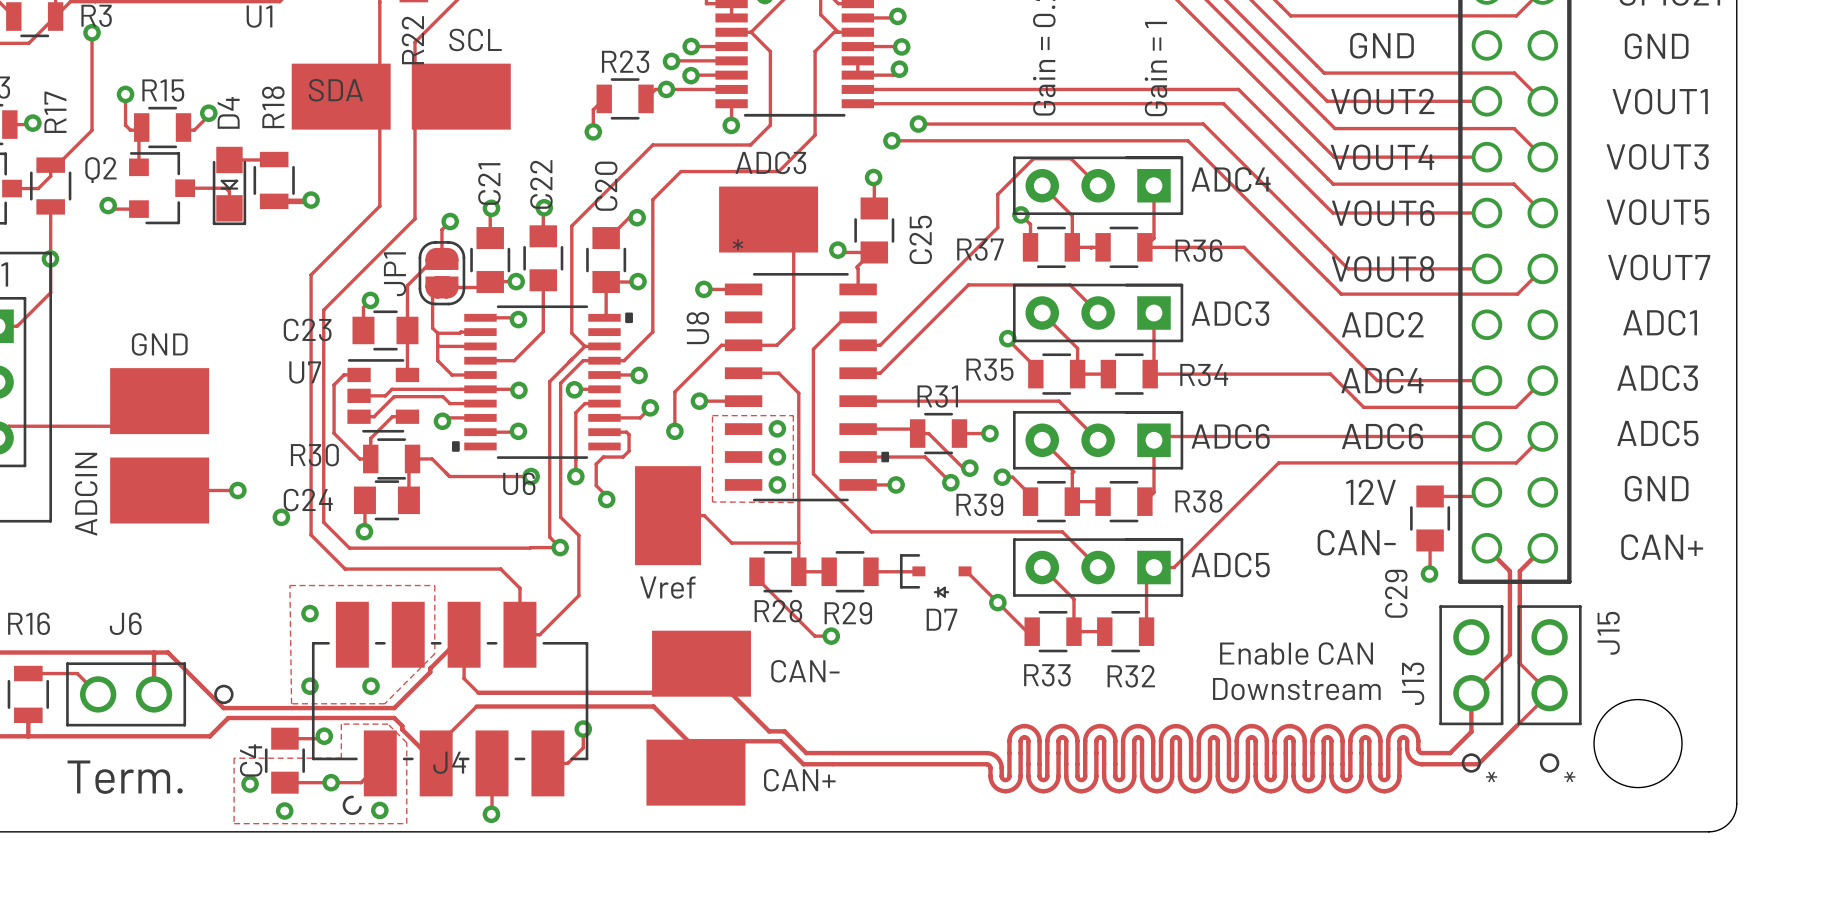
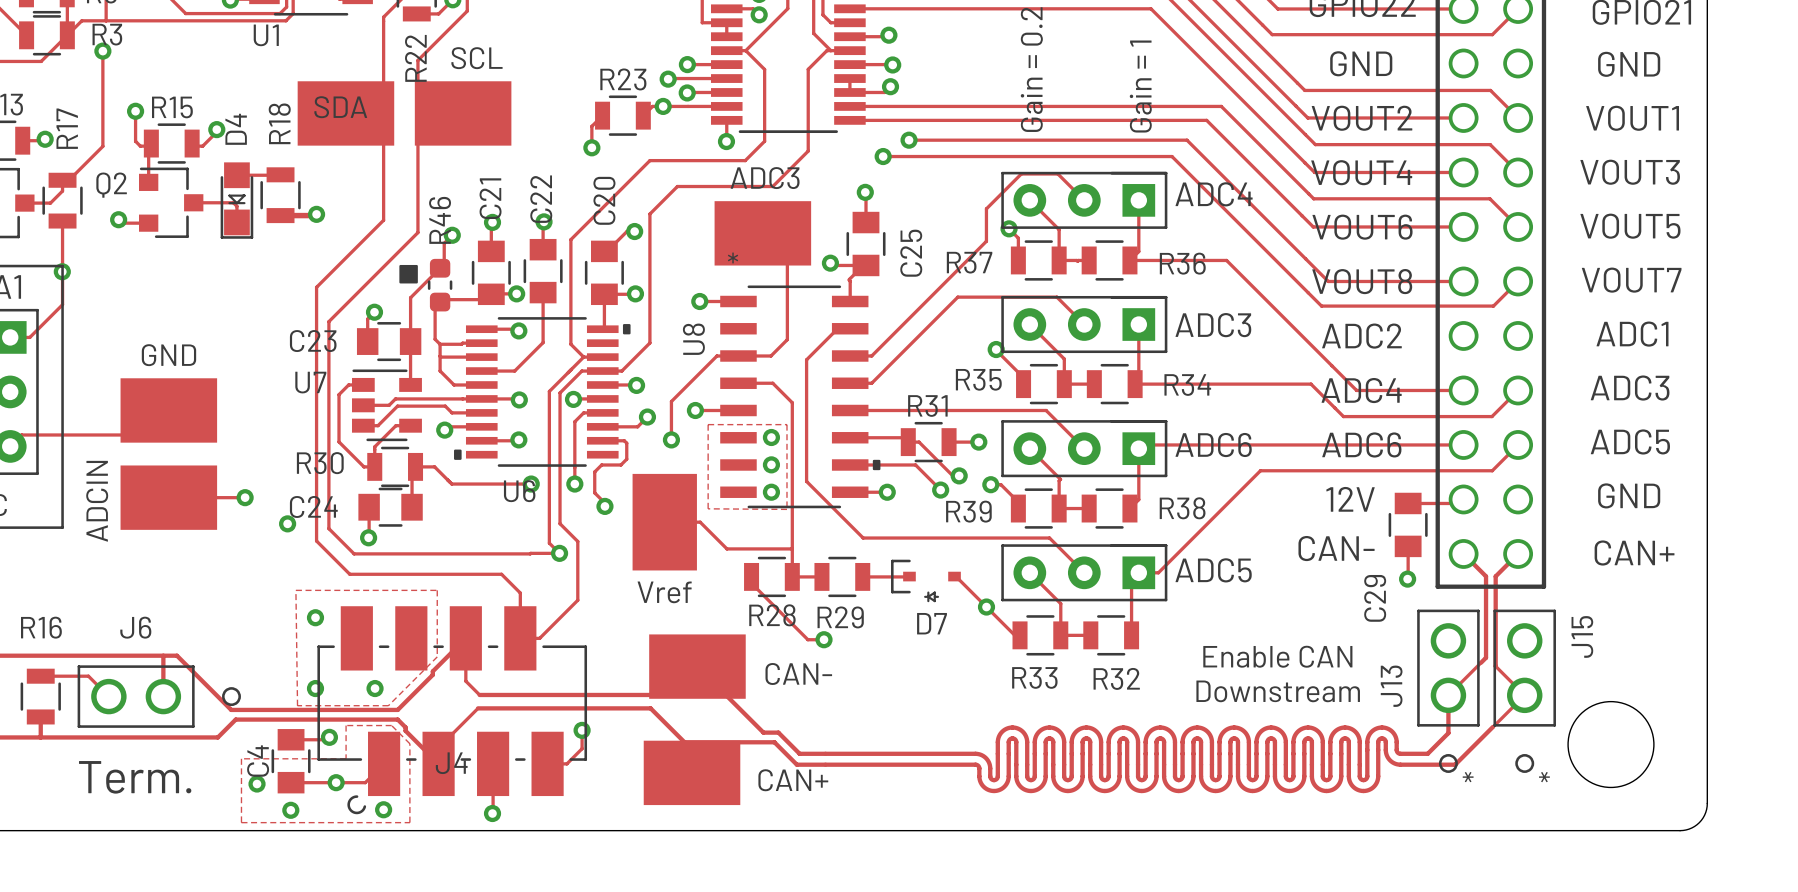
drawing: none -> [399, 264, 418, 284]
R46: none -> (440, 285)
JP1: (441, 273) -> none

